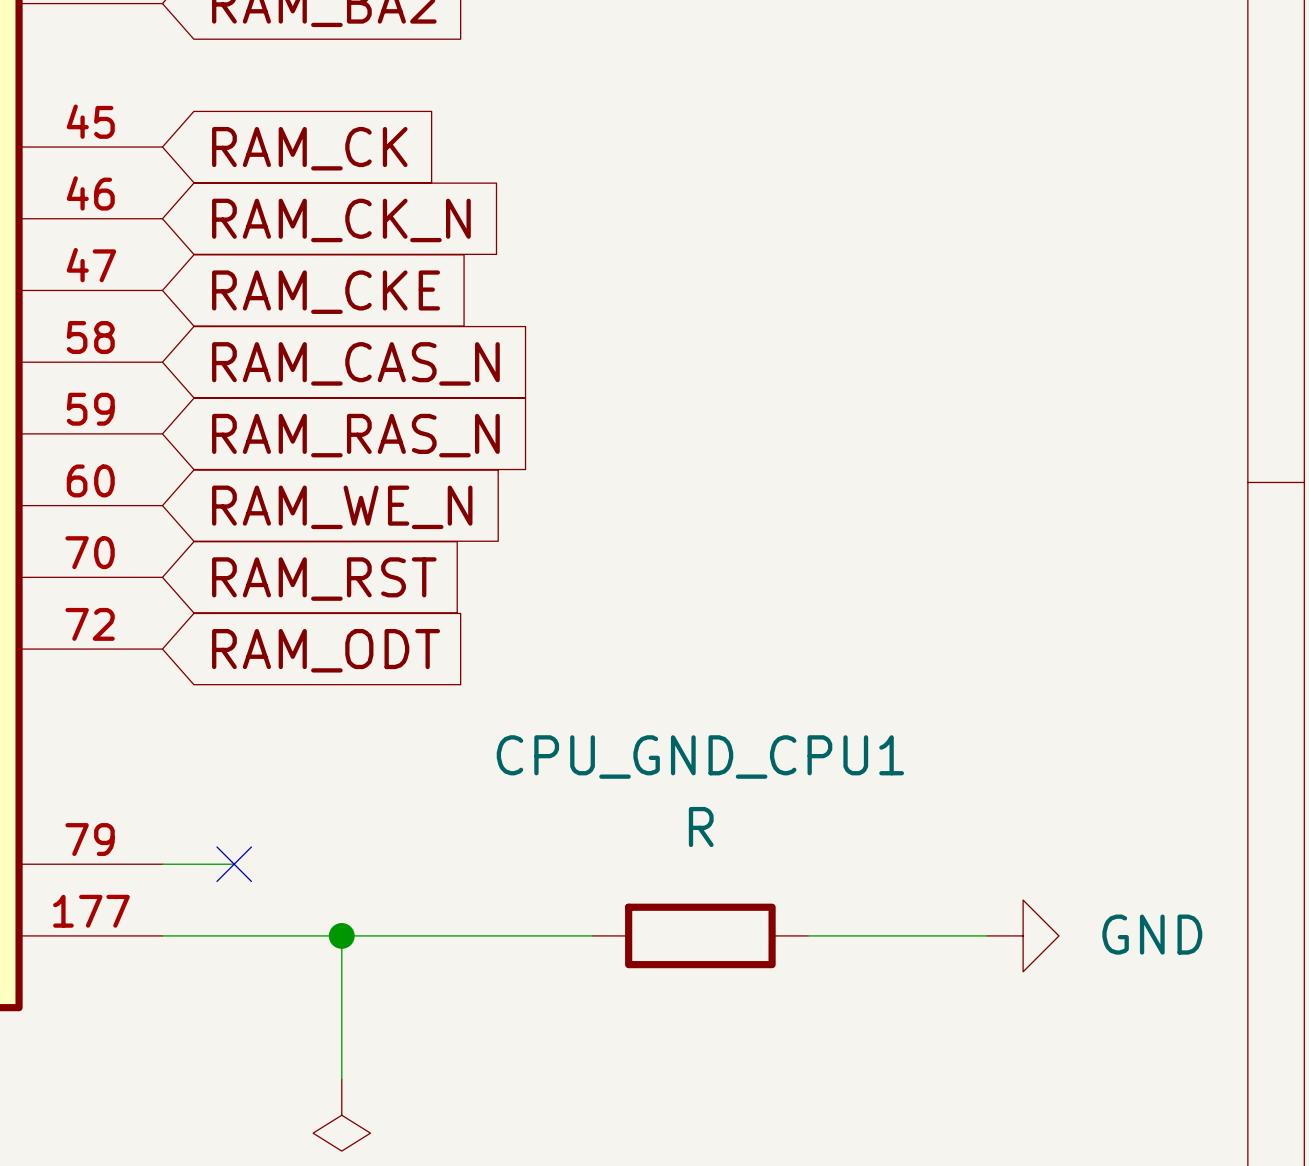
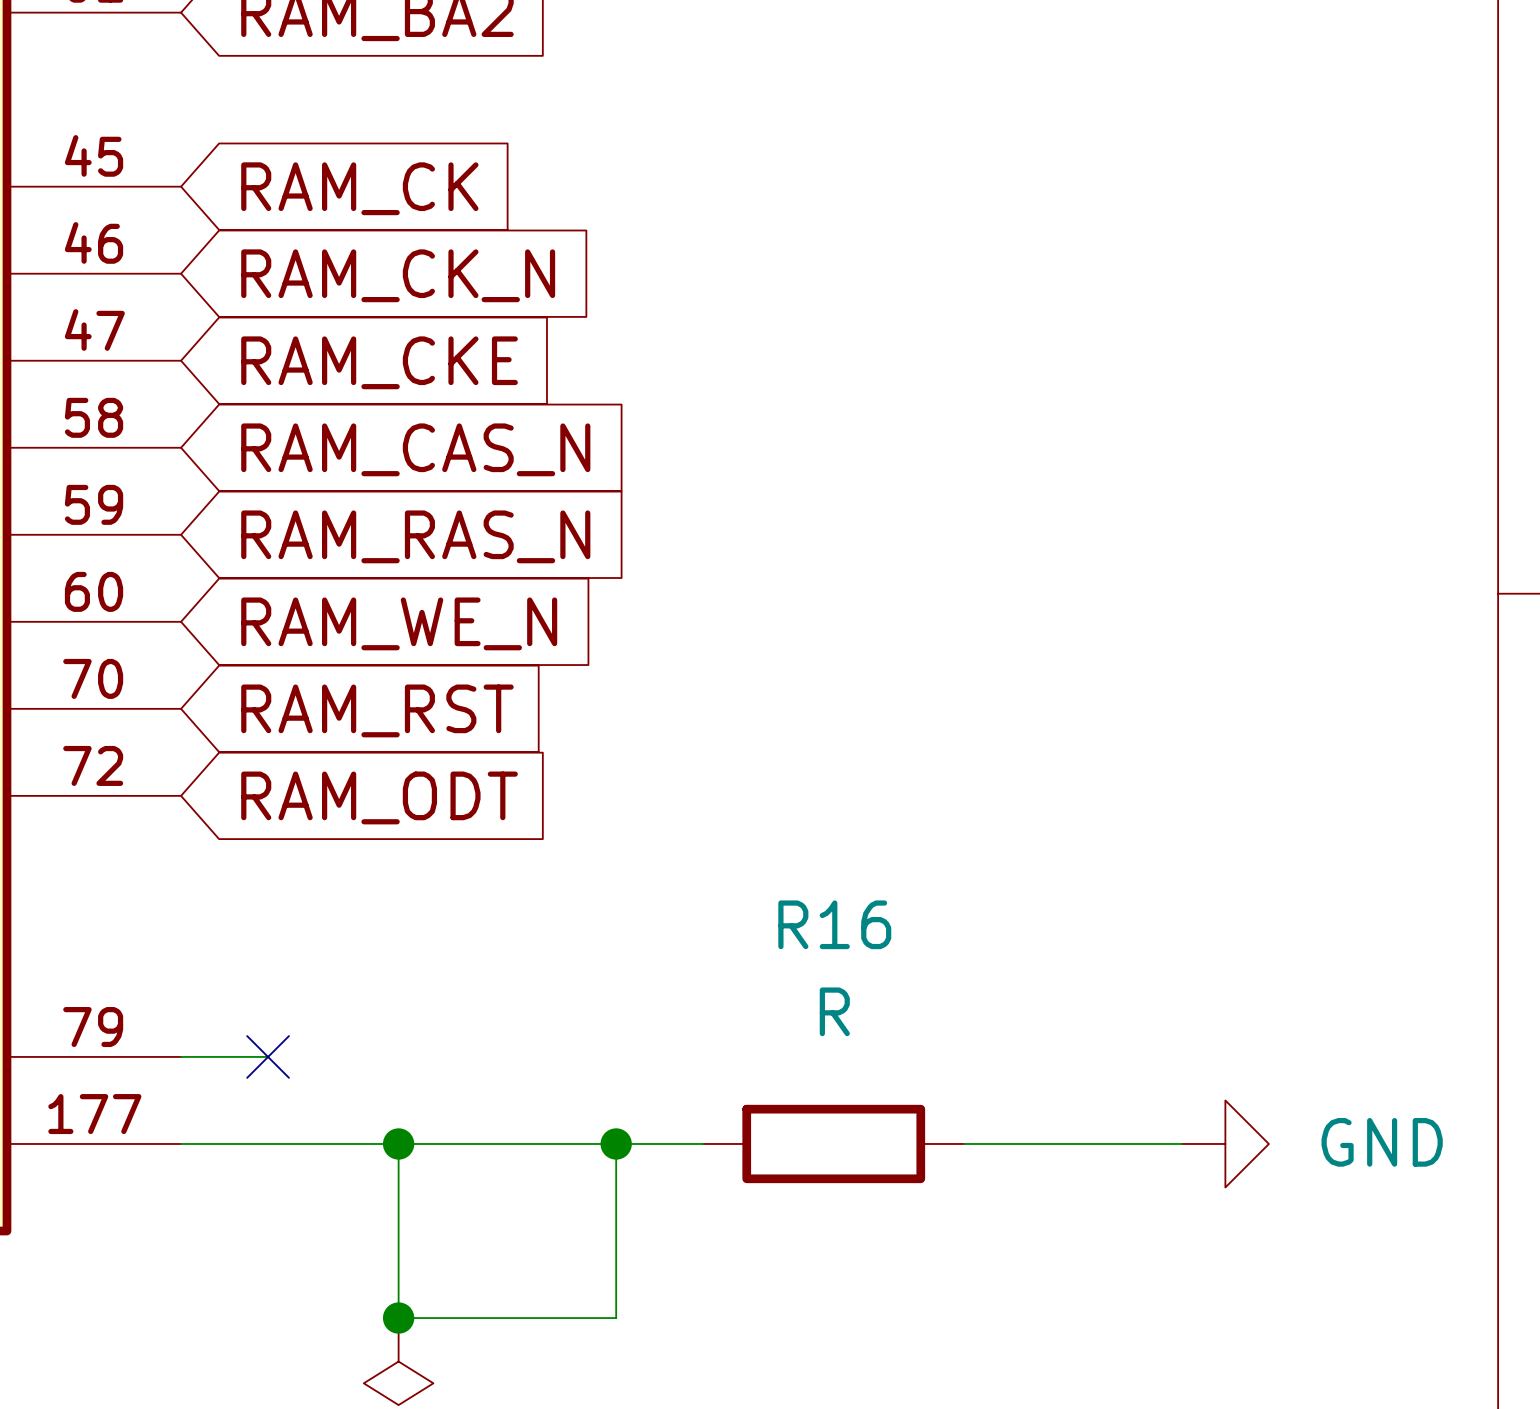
CPU_GND_CPU1 name: CPU_GND_CPU1 (700, 757) -> R16 (834, 924)
wire: none -> (616, 1143) (616, 1318) (398, 1318)
junction: none -> (616, 1143)
junction: none -> (398, 1318)

